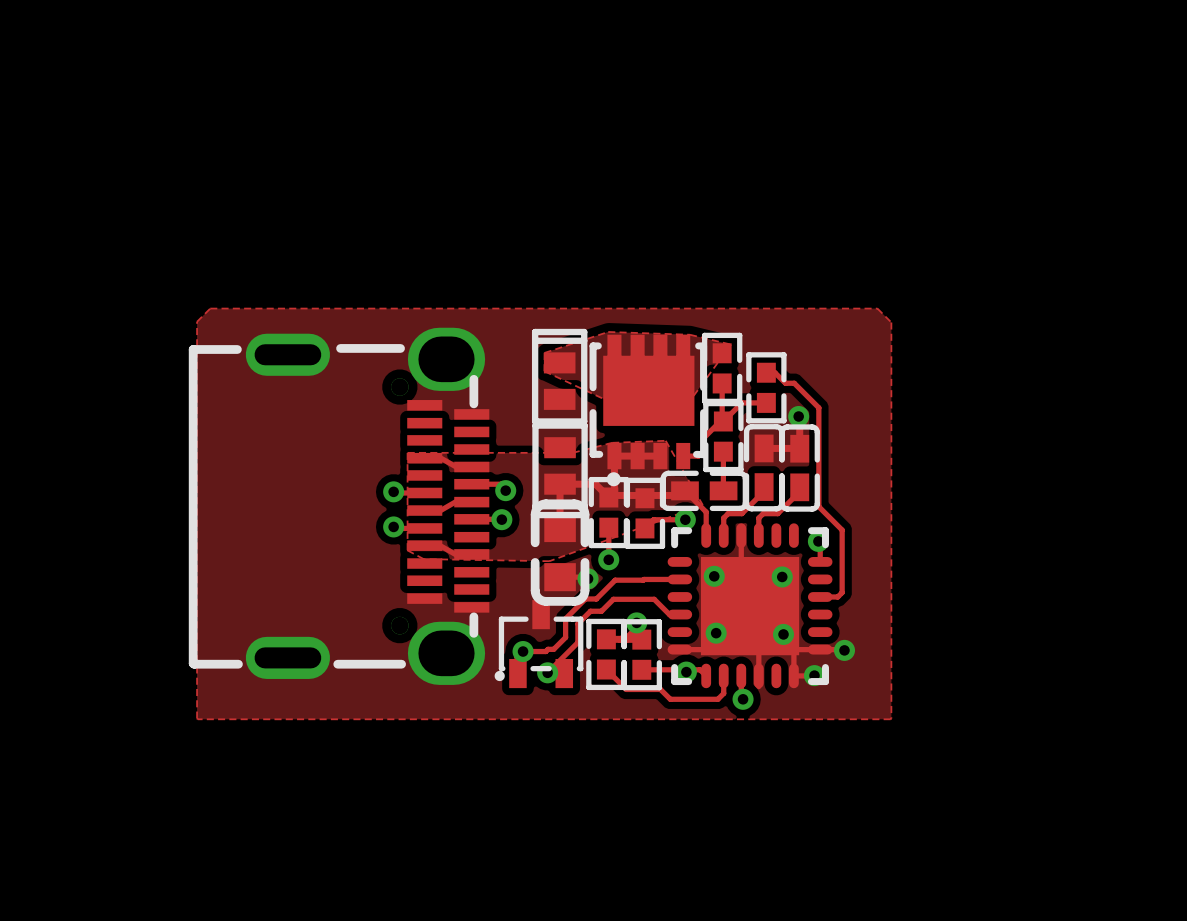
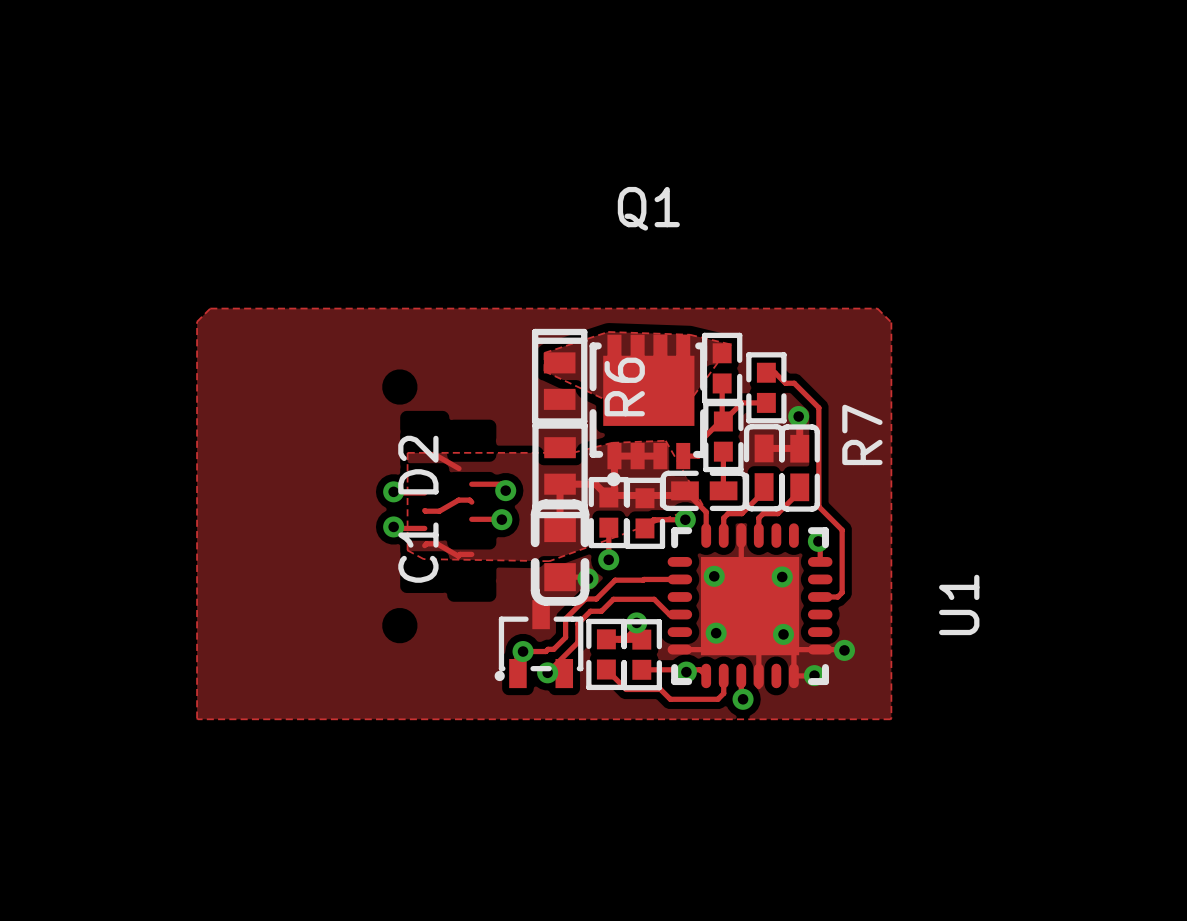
Q1 name: none -> Q1 (648, 208)
R6 name: none -> R6 (624, 386)
R7 name: none -> R7 (862, 434)
D2 name: none -> D2 (418, 465)
part: (339, 506) -> none
C1 name: none -> C1 (418, 552)
U1 name: none -> U1 (959, 604)

